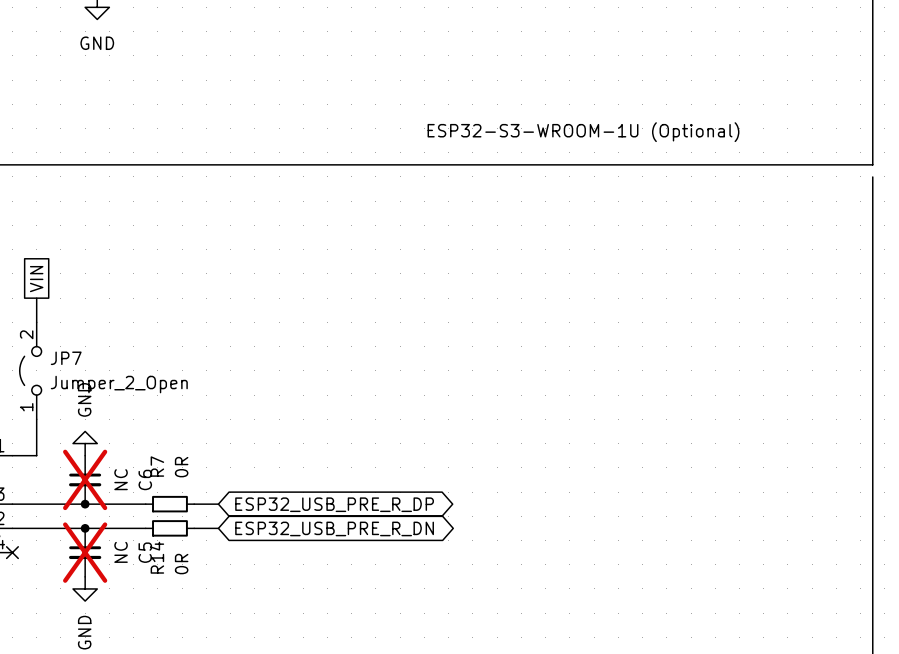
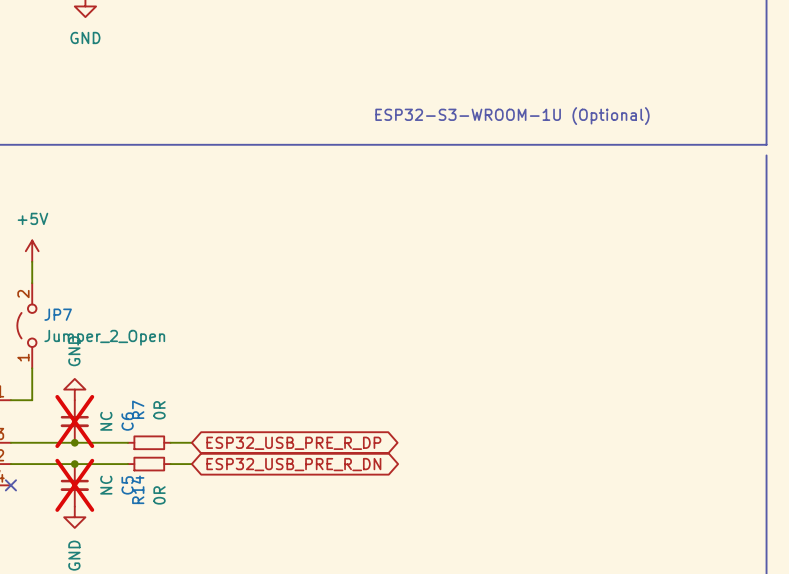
global label: VIN (36, 279) -> none
power symbol: none -> +5V (32, 251)

